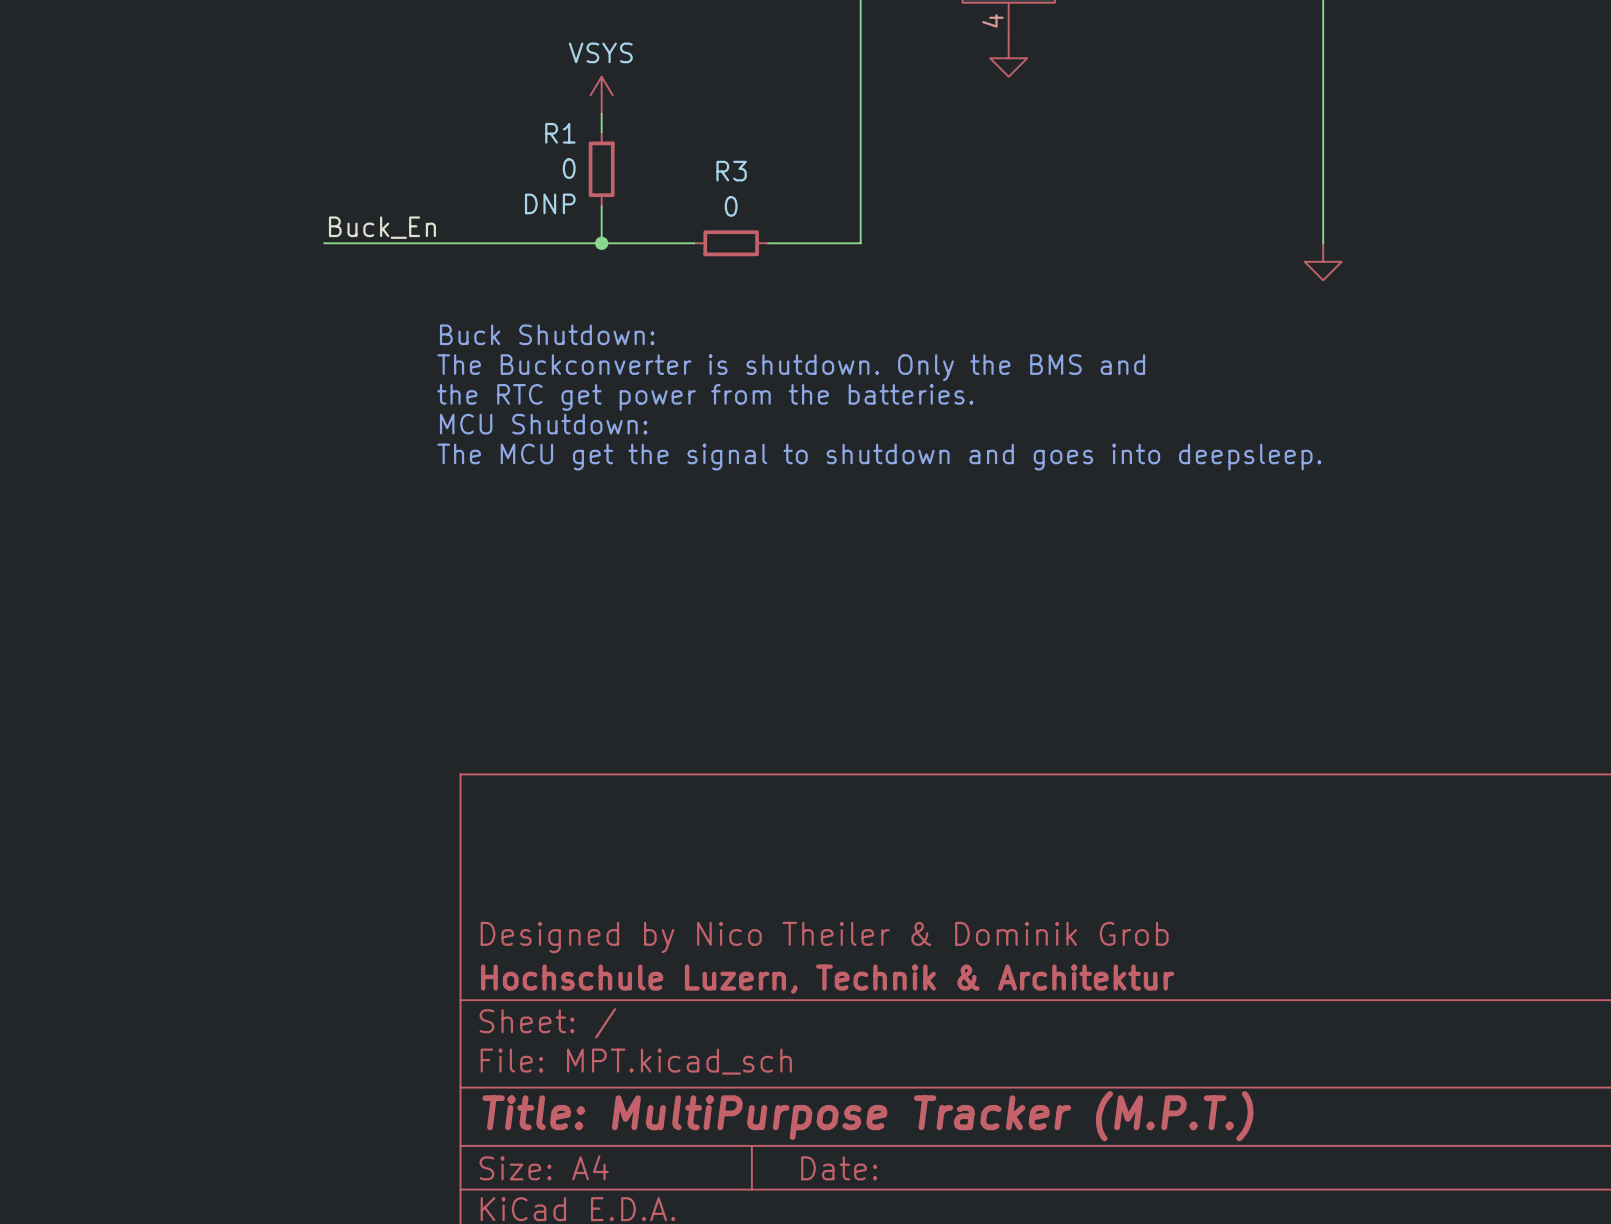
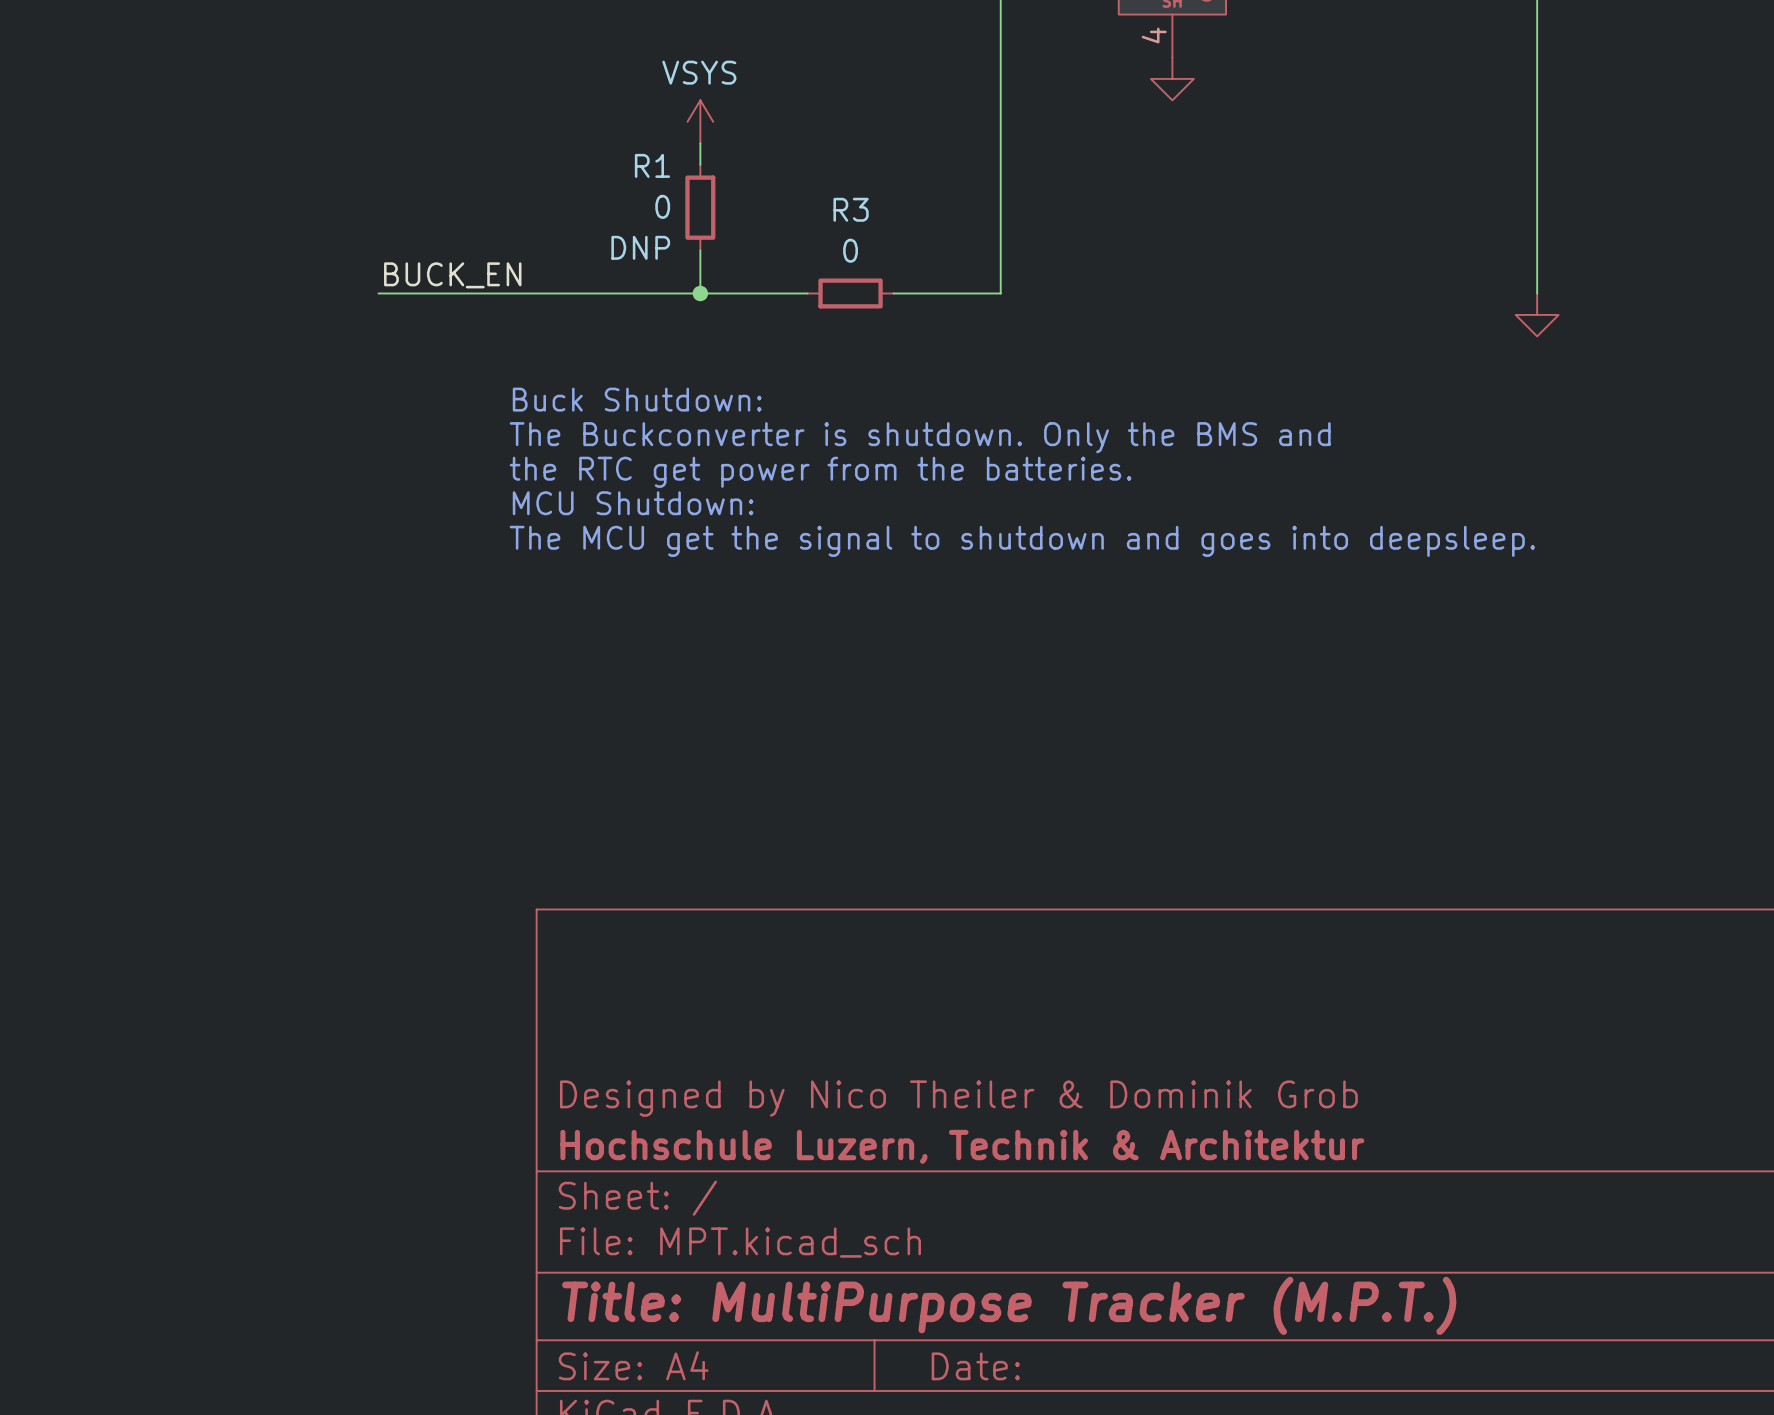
label: Buck_En (382, 227) -> BUCK_EN (452, 275)

